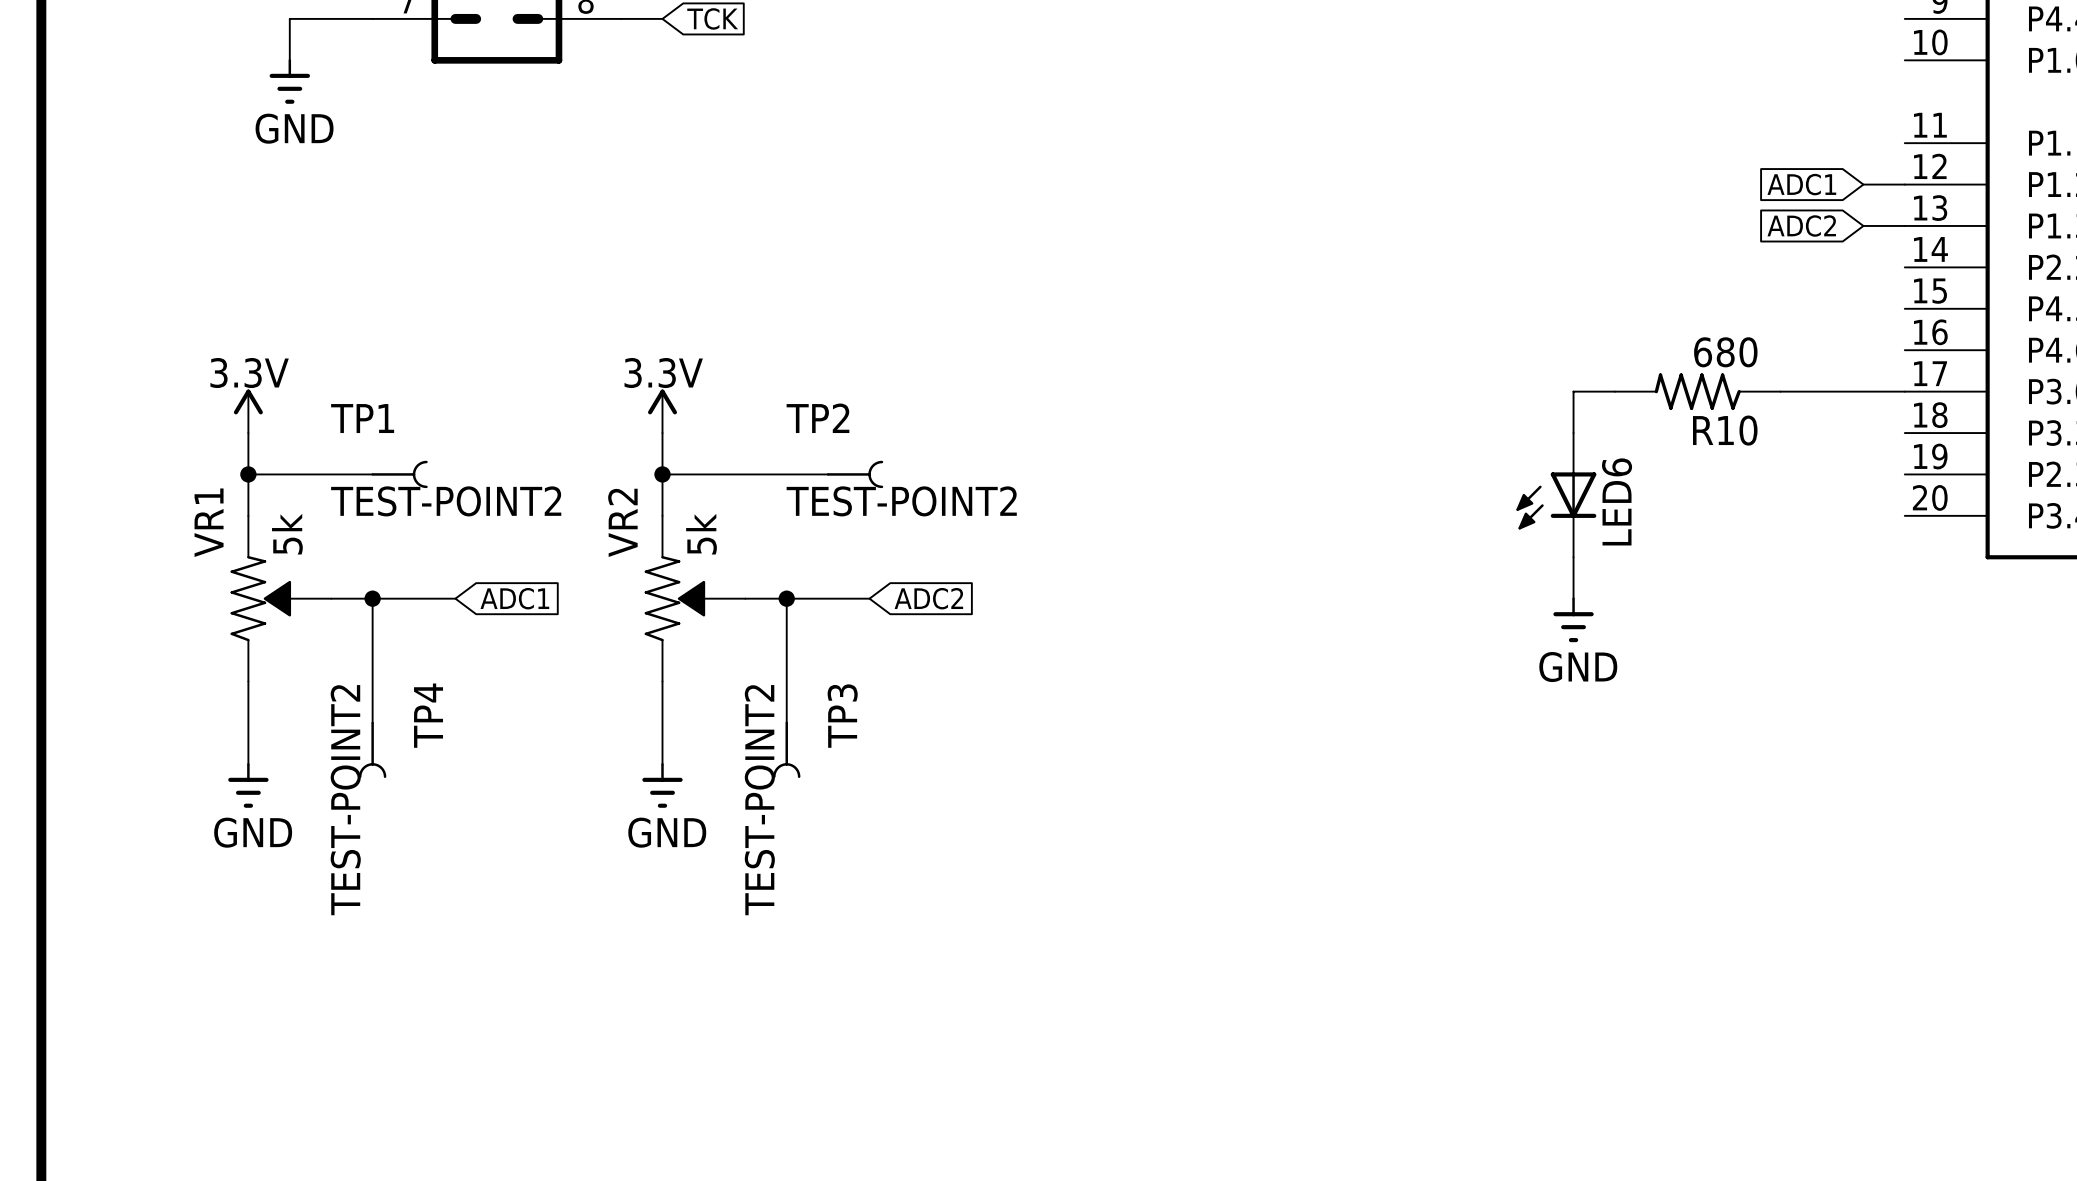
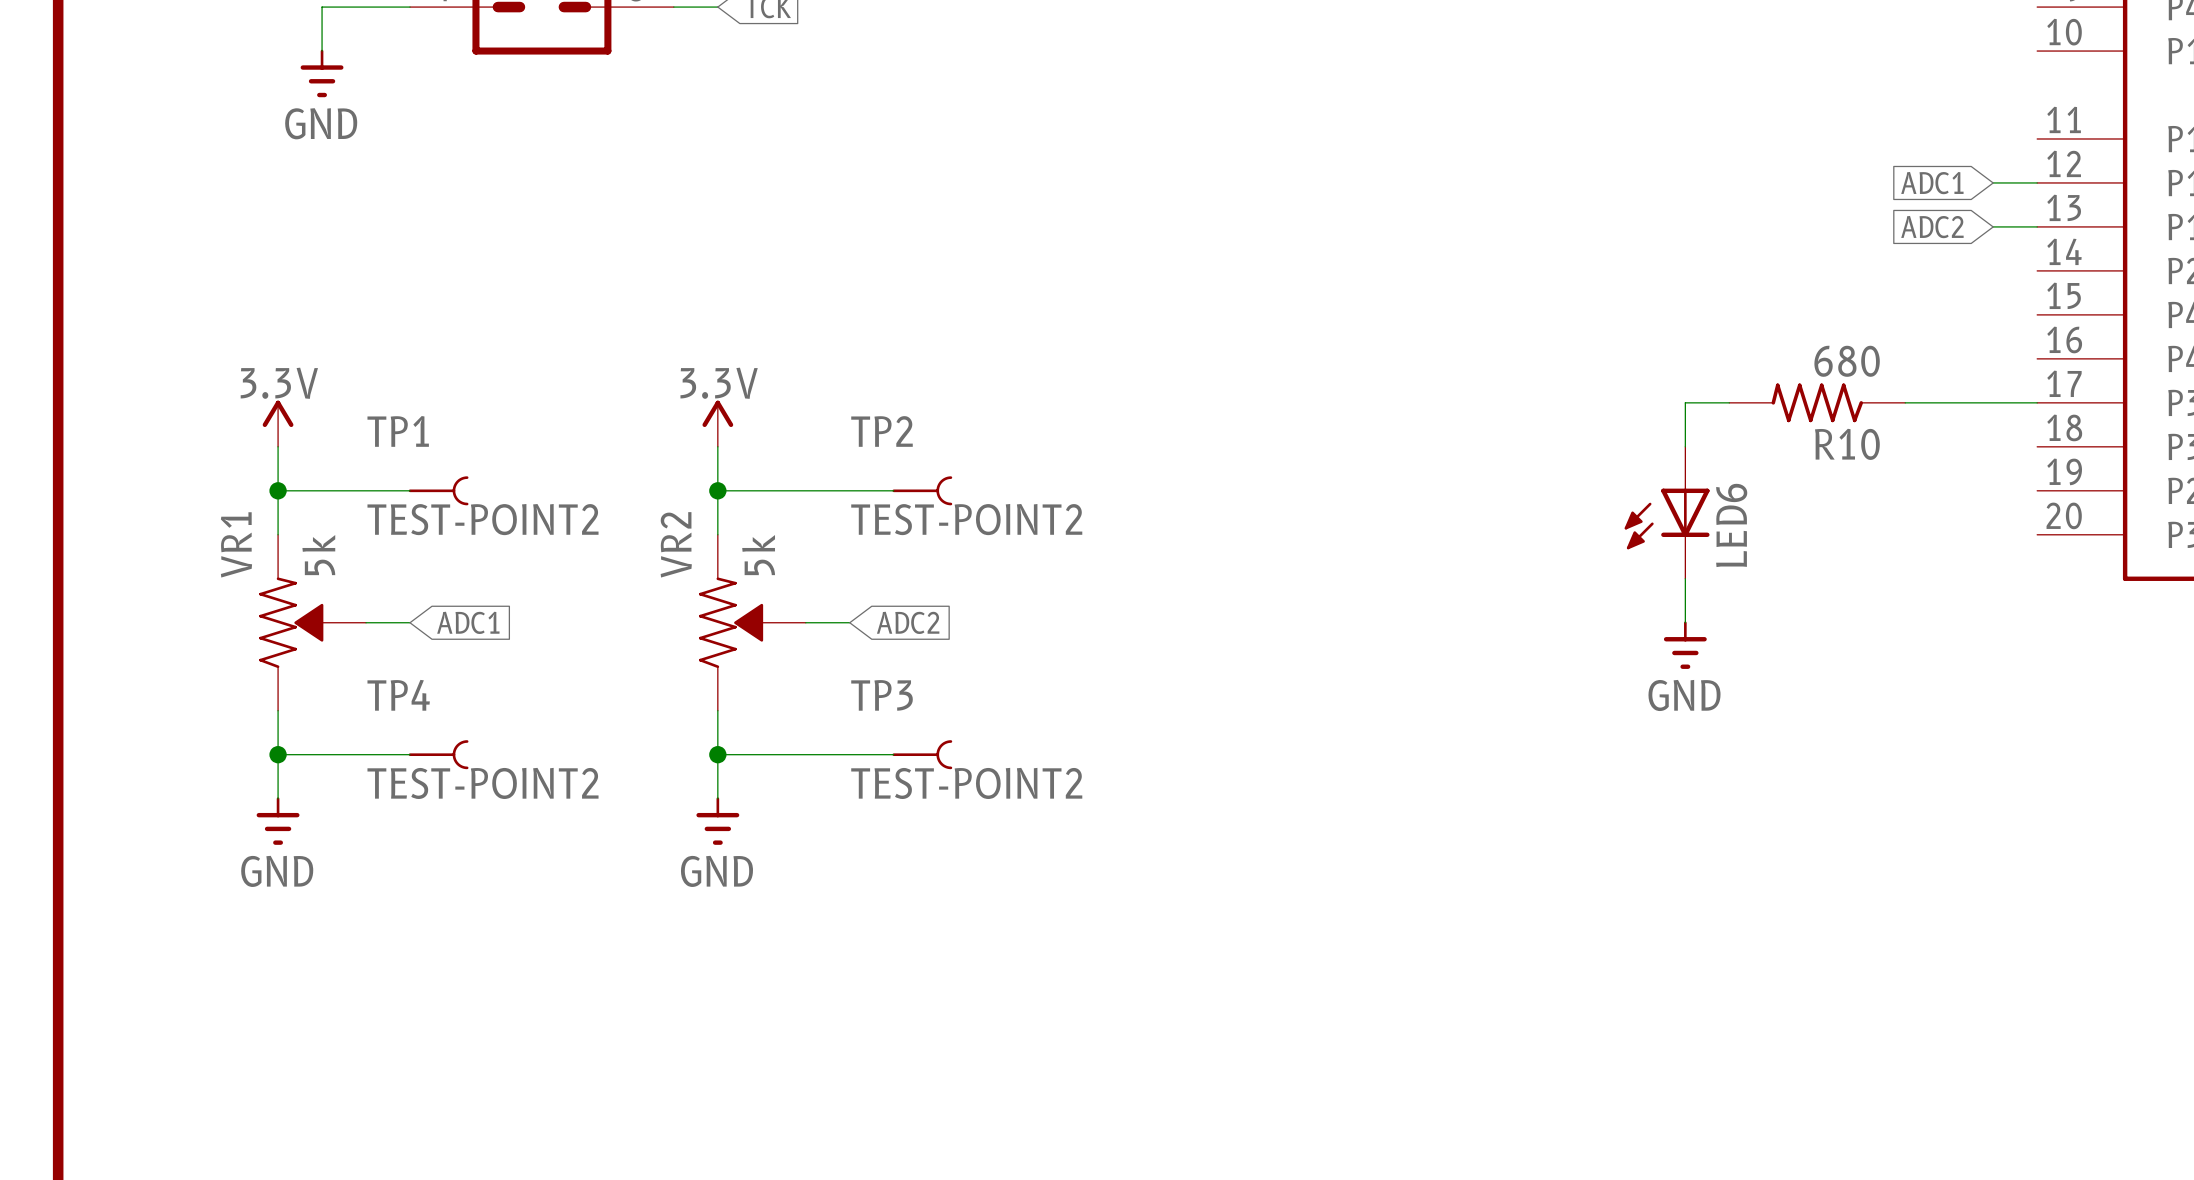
junction: (372, 598) -> none
wire: (455, 598) (372, 598) (372, 722) -> (278, 754) (409, 754)
global label position: ADC1 (514, 598) -> ADC1 (468, 622)
junction: (786, 598) -> none
wire: (869, 598) (786, 598) (786, 722) -> none
global label position: ADC2 (928, 598) -> ADC2 (908, 622)
junction: none -> (278, 754)
wire: none -> (717, 754) (893, 754)
junction: none -> (717, 754)
TP4 rotation: 0° (372, 749) -> 90° counterclockwise (438, 754)
TP4 position: (372, 749) -> (438, 754)
TP3 rotation: 0° (786, 749) -> 90° counterclockwise (922, 754)
TP3 position: (786, 749) -> (922, 754)

